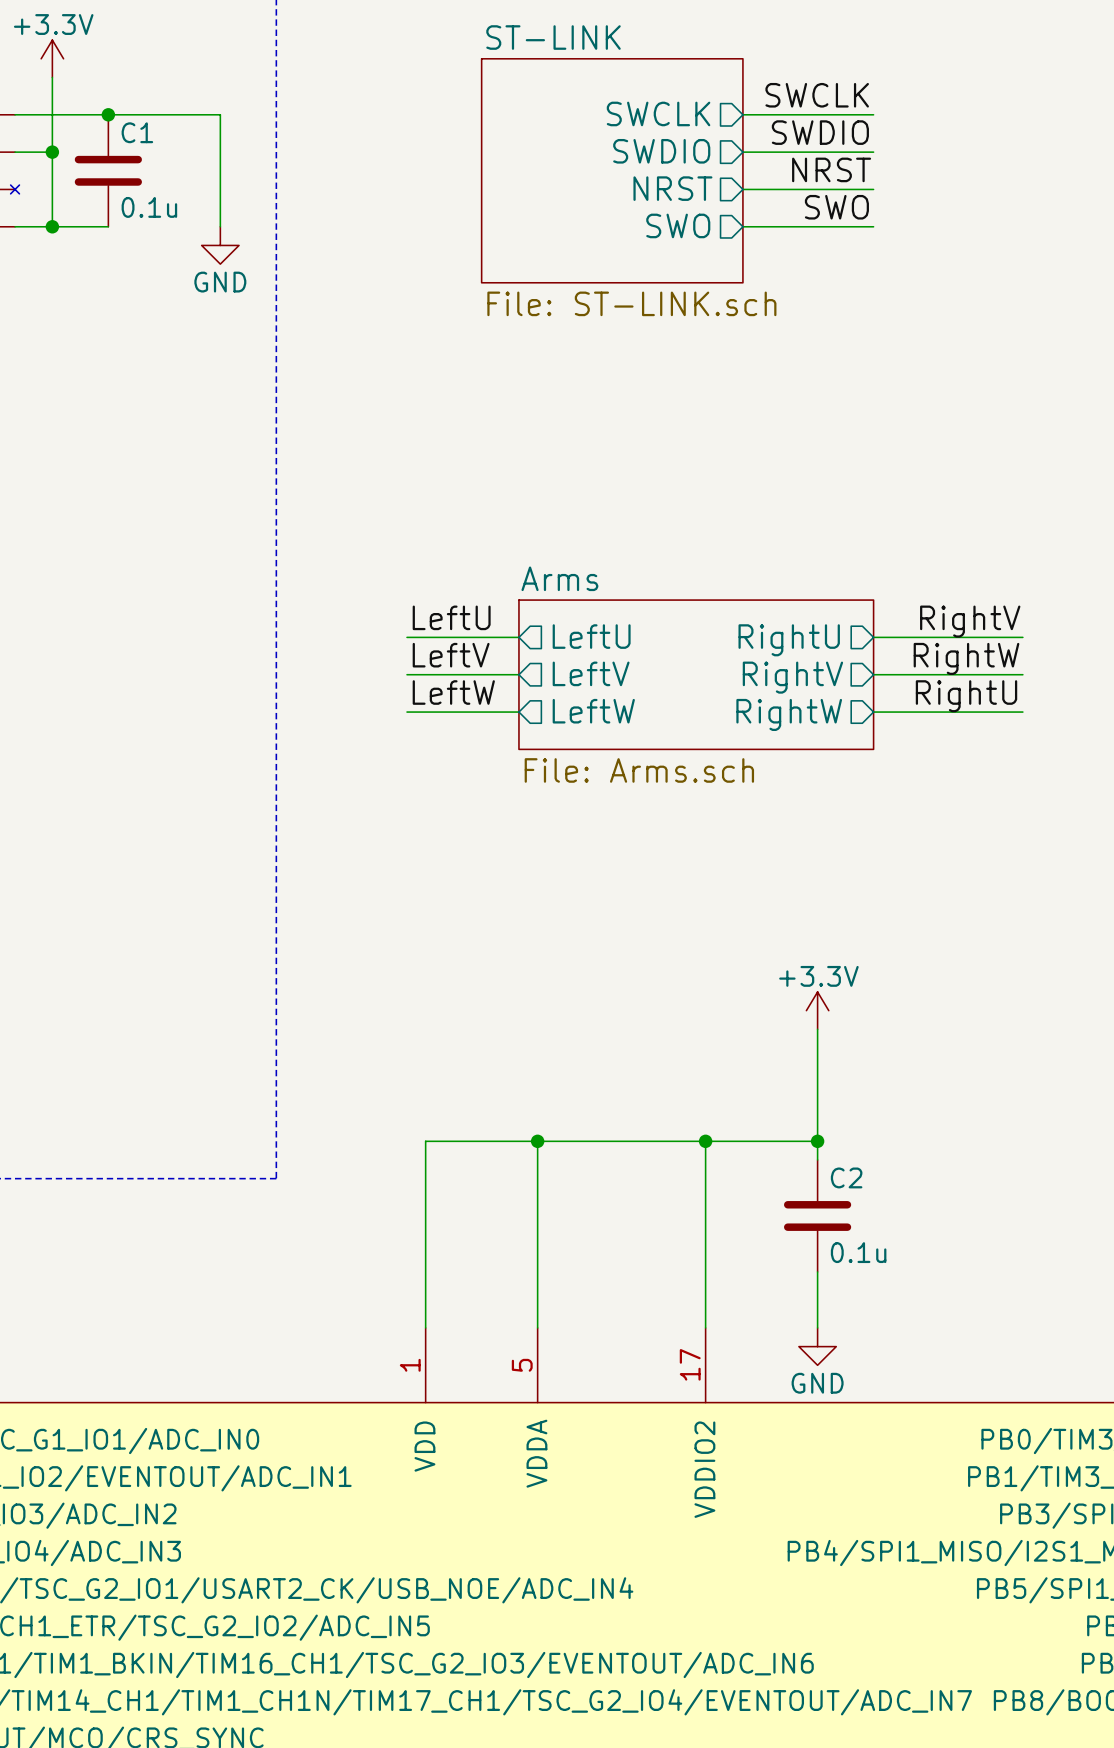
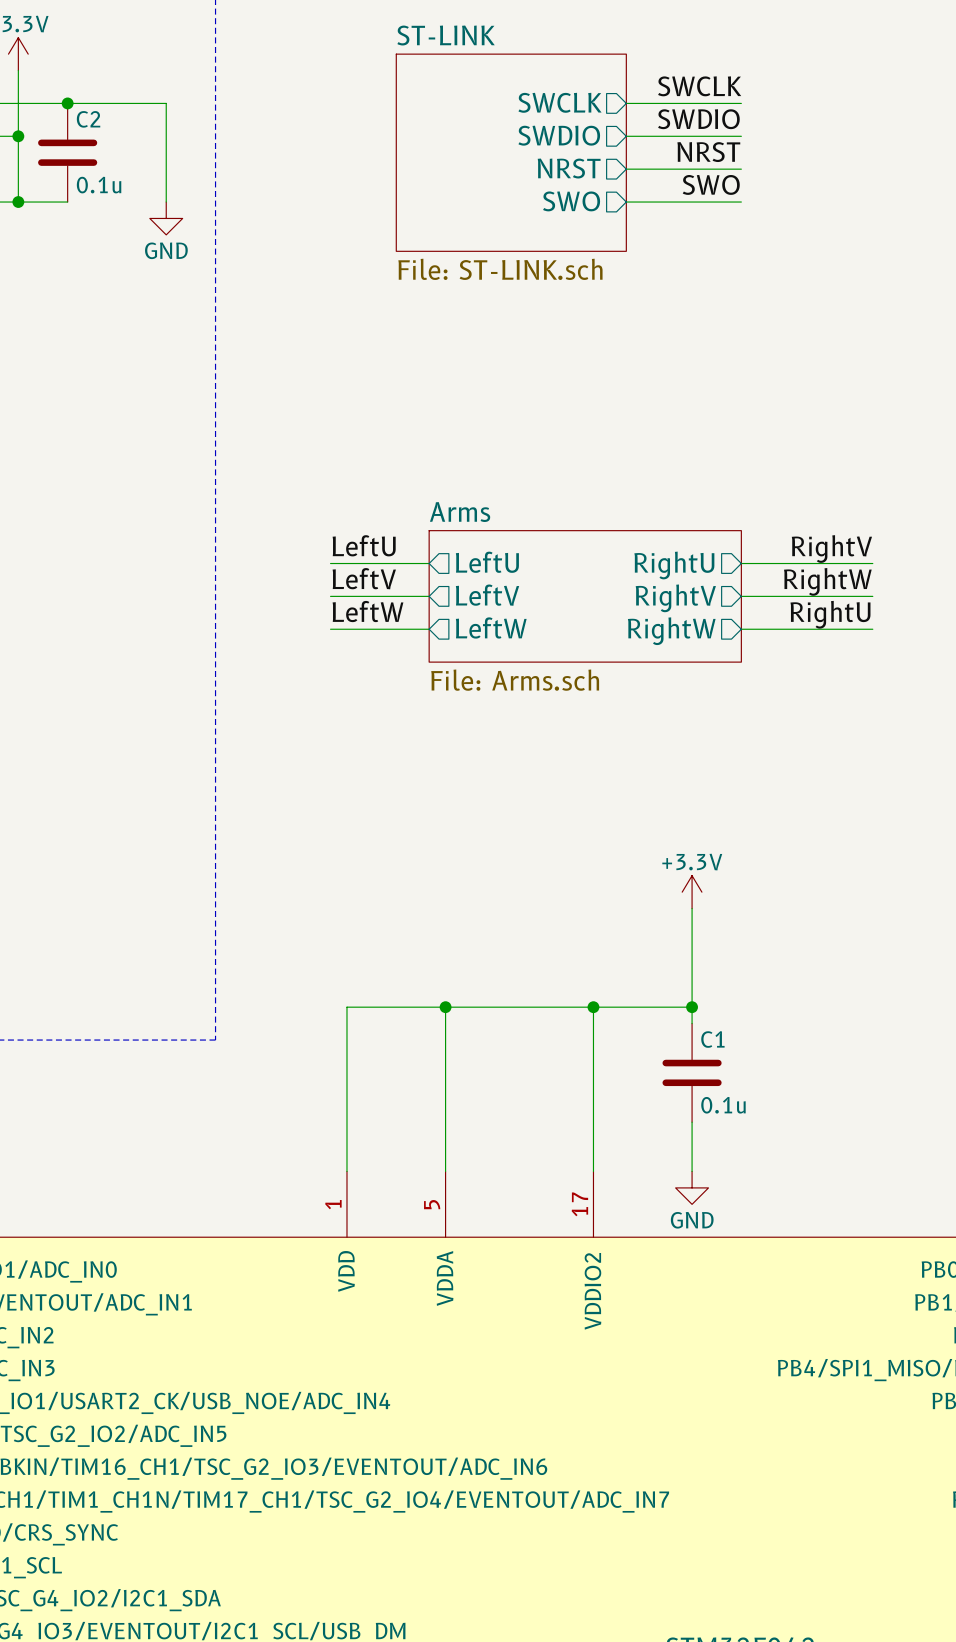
C1 name: C1 (137, 132) -> C2 (88, 119)
C2 name: C2 (846, 1177) -> C1 (712, 1039)

